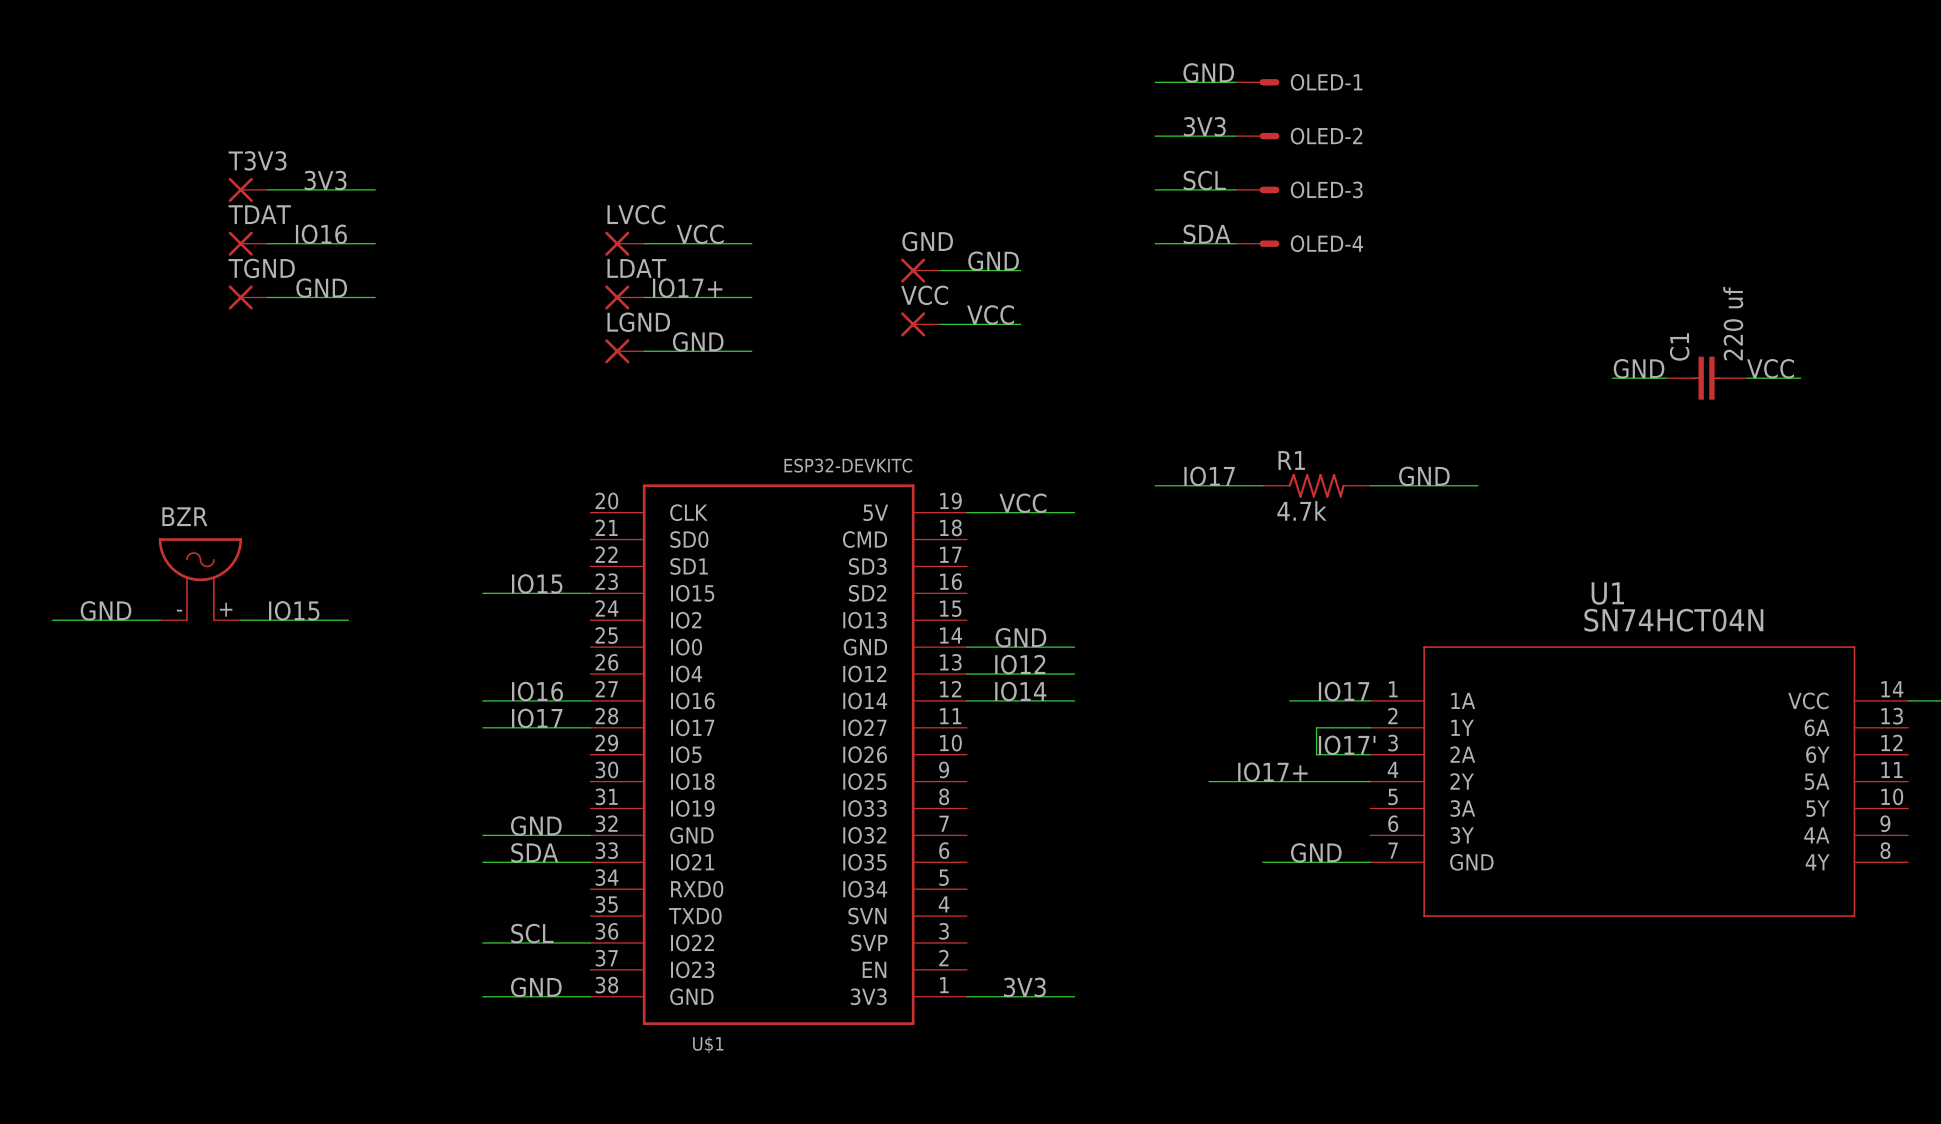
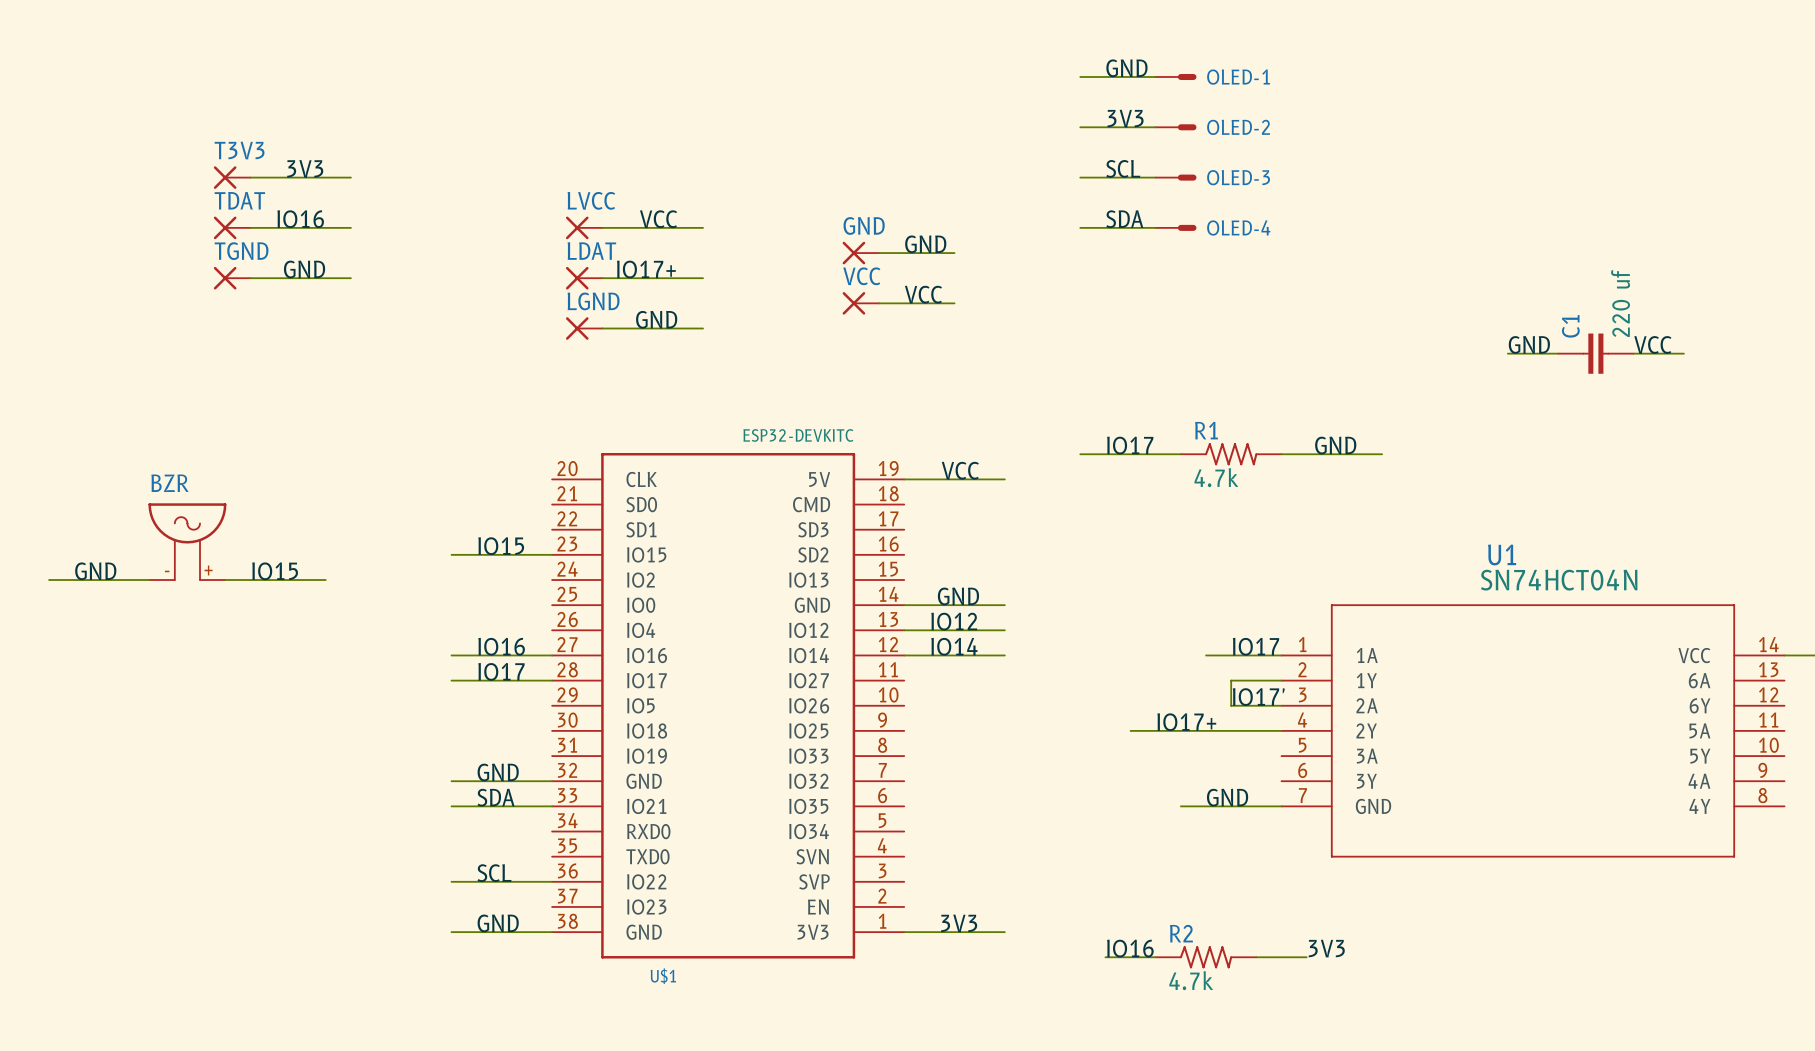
label: none -> IO16 (1130, 948)
label: none -> 3V3 (1326, 948)
wire: none -> (1105, 957) (1155, 957)
R2: none -> 4.7k (1206, 957)
wire: none -> (1256, 957) (1306, 957)

